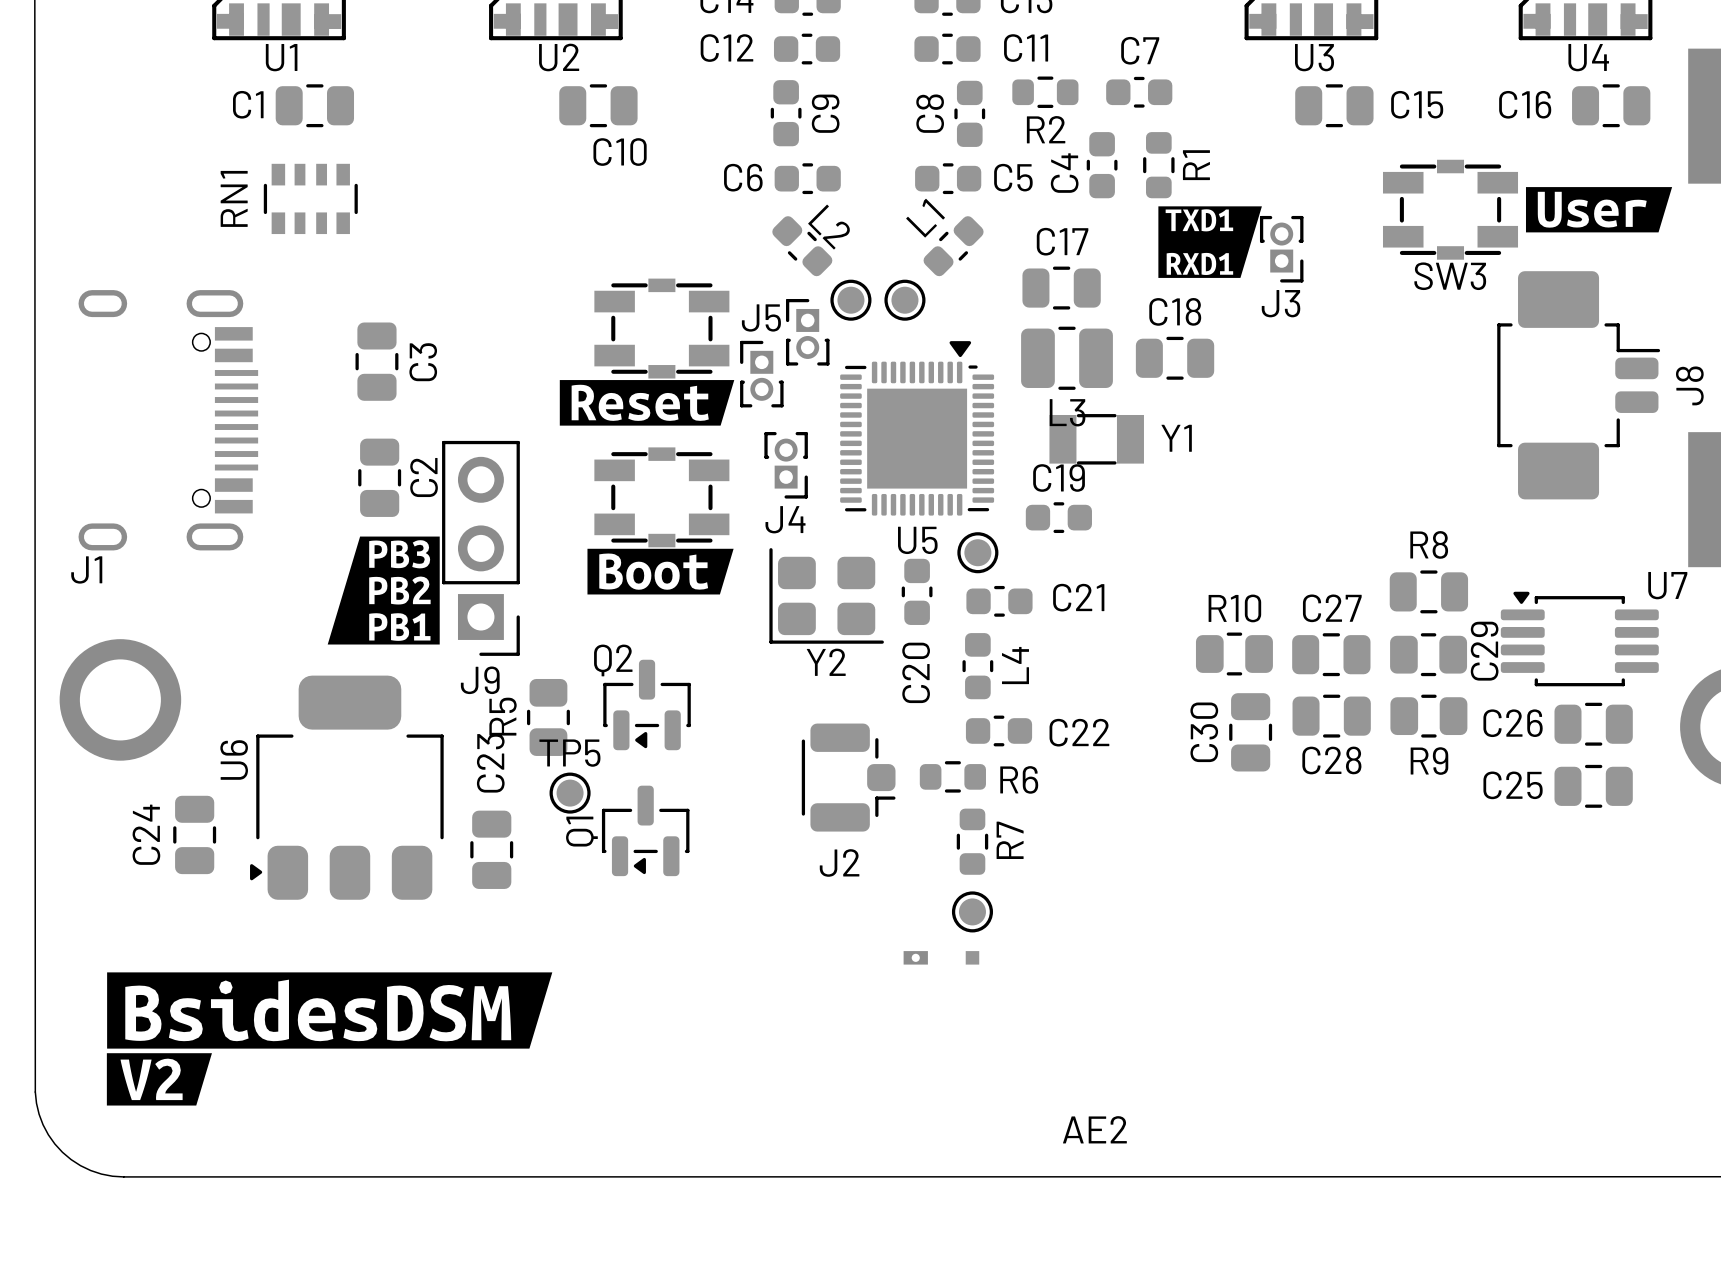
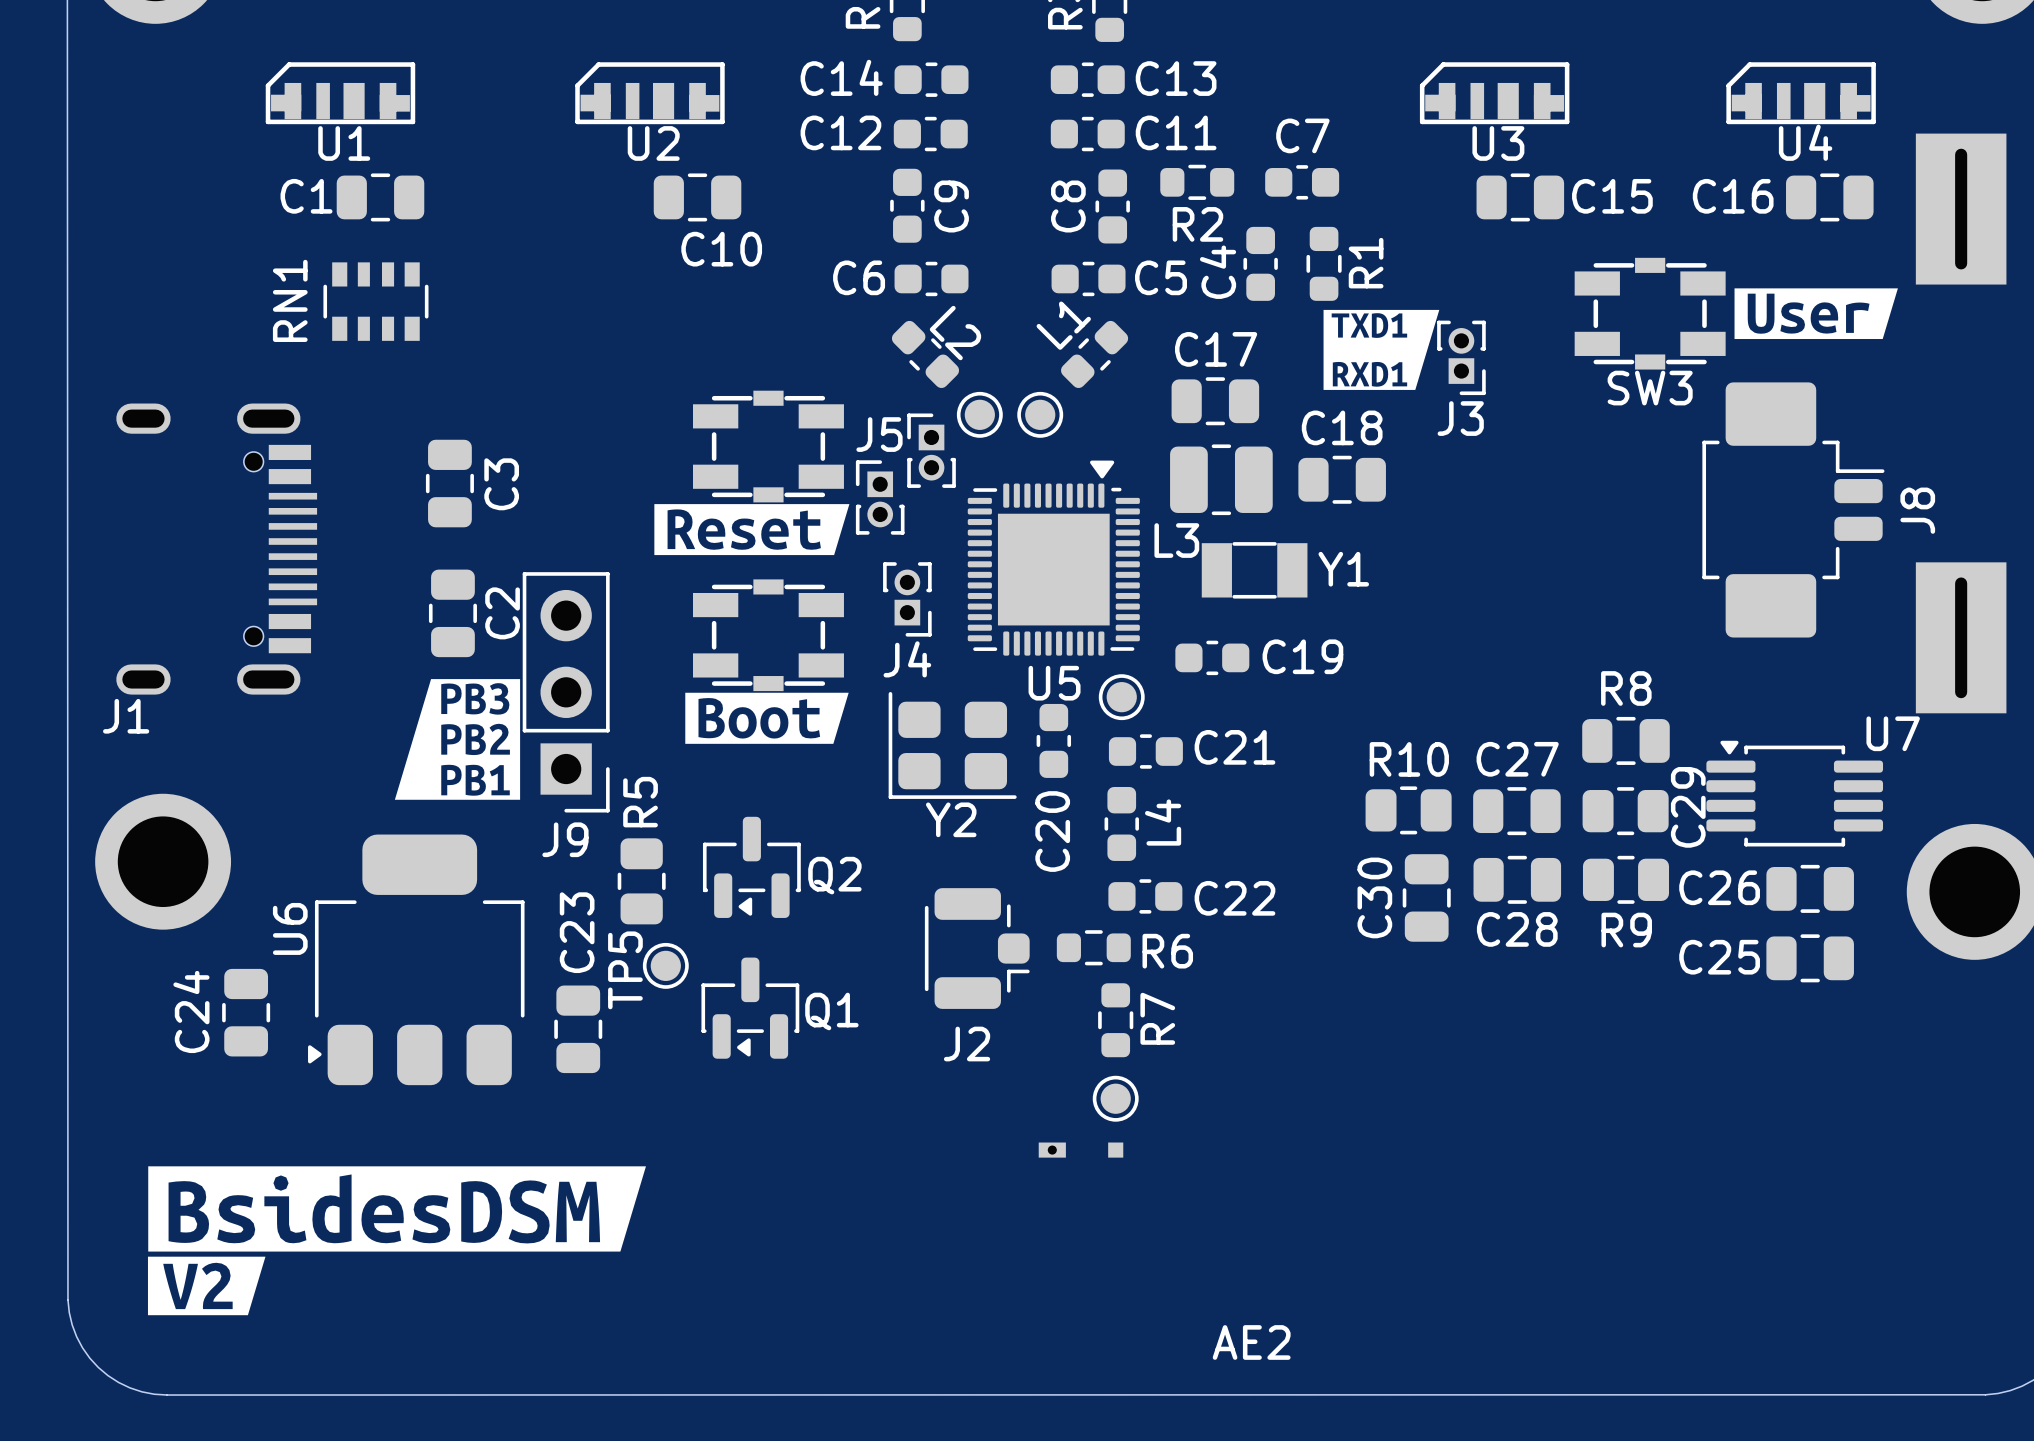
L3 name position: L3 (1067, 412) -> L3 (1176, 540)
C19 name position: C19 (1059, 478) -> C19 (1302, 656)
Q2 name position: Q2 (613, 660) -> Q2 (834, 875)
R5 name position: R5 (503, 716) -> R5 (640, 802)
TP5 name rotation: 0° (569, 753) -> 90° counterclockwise (625, 970)
Q1 name rotation: 0° (581, 831) -> 90° clockwise (831, 1011)
Q1 name position: Q1 (581, 831) -> Q1 (831, 1011)

